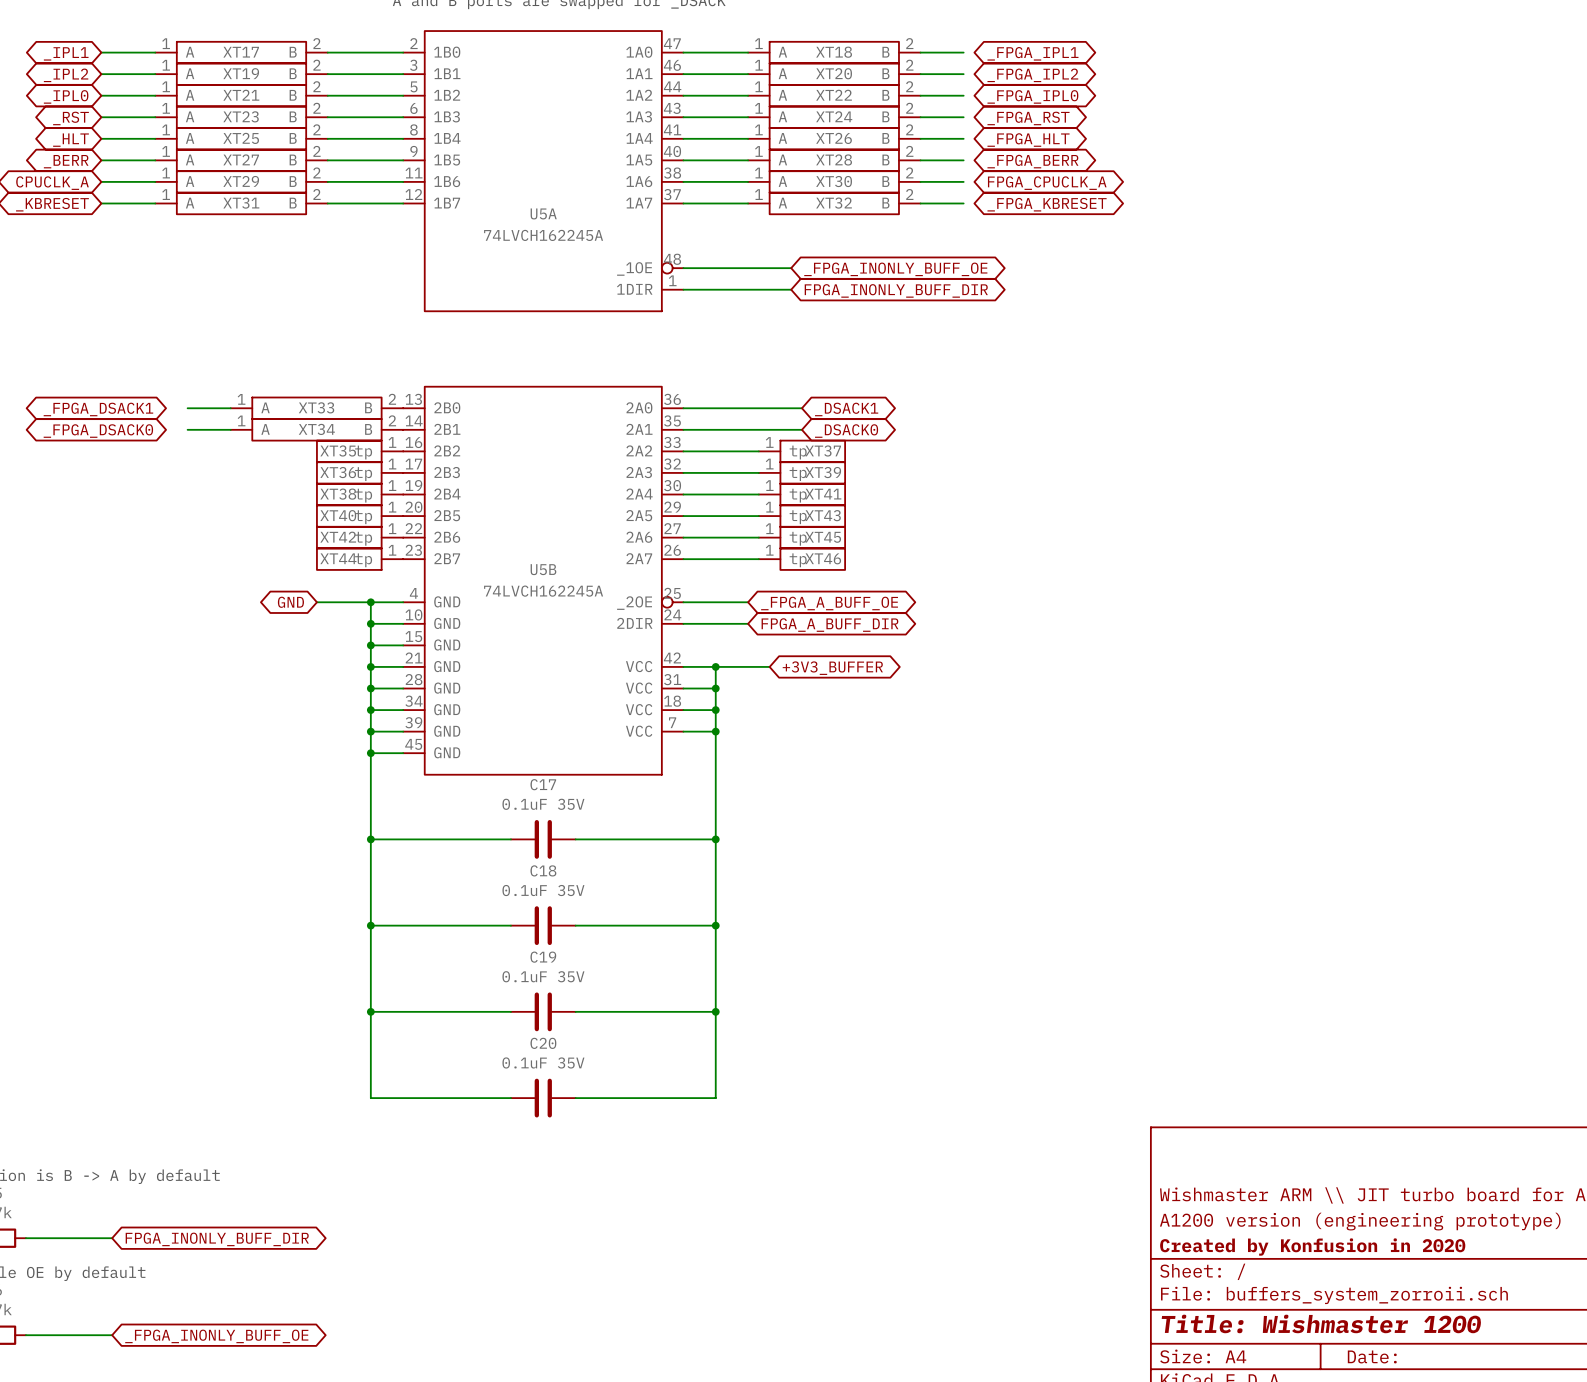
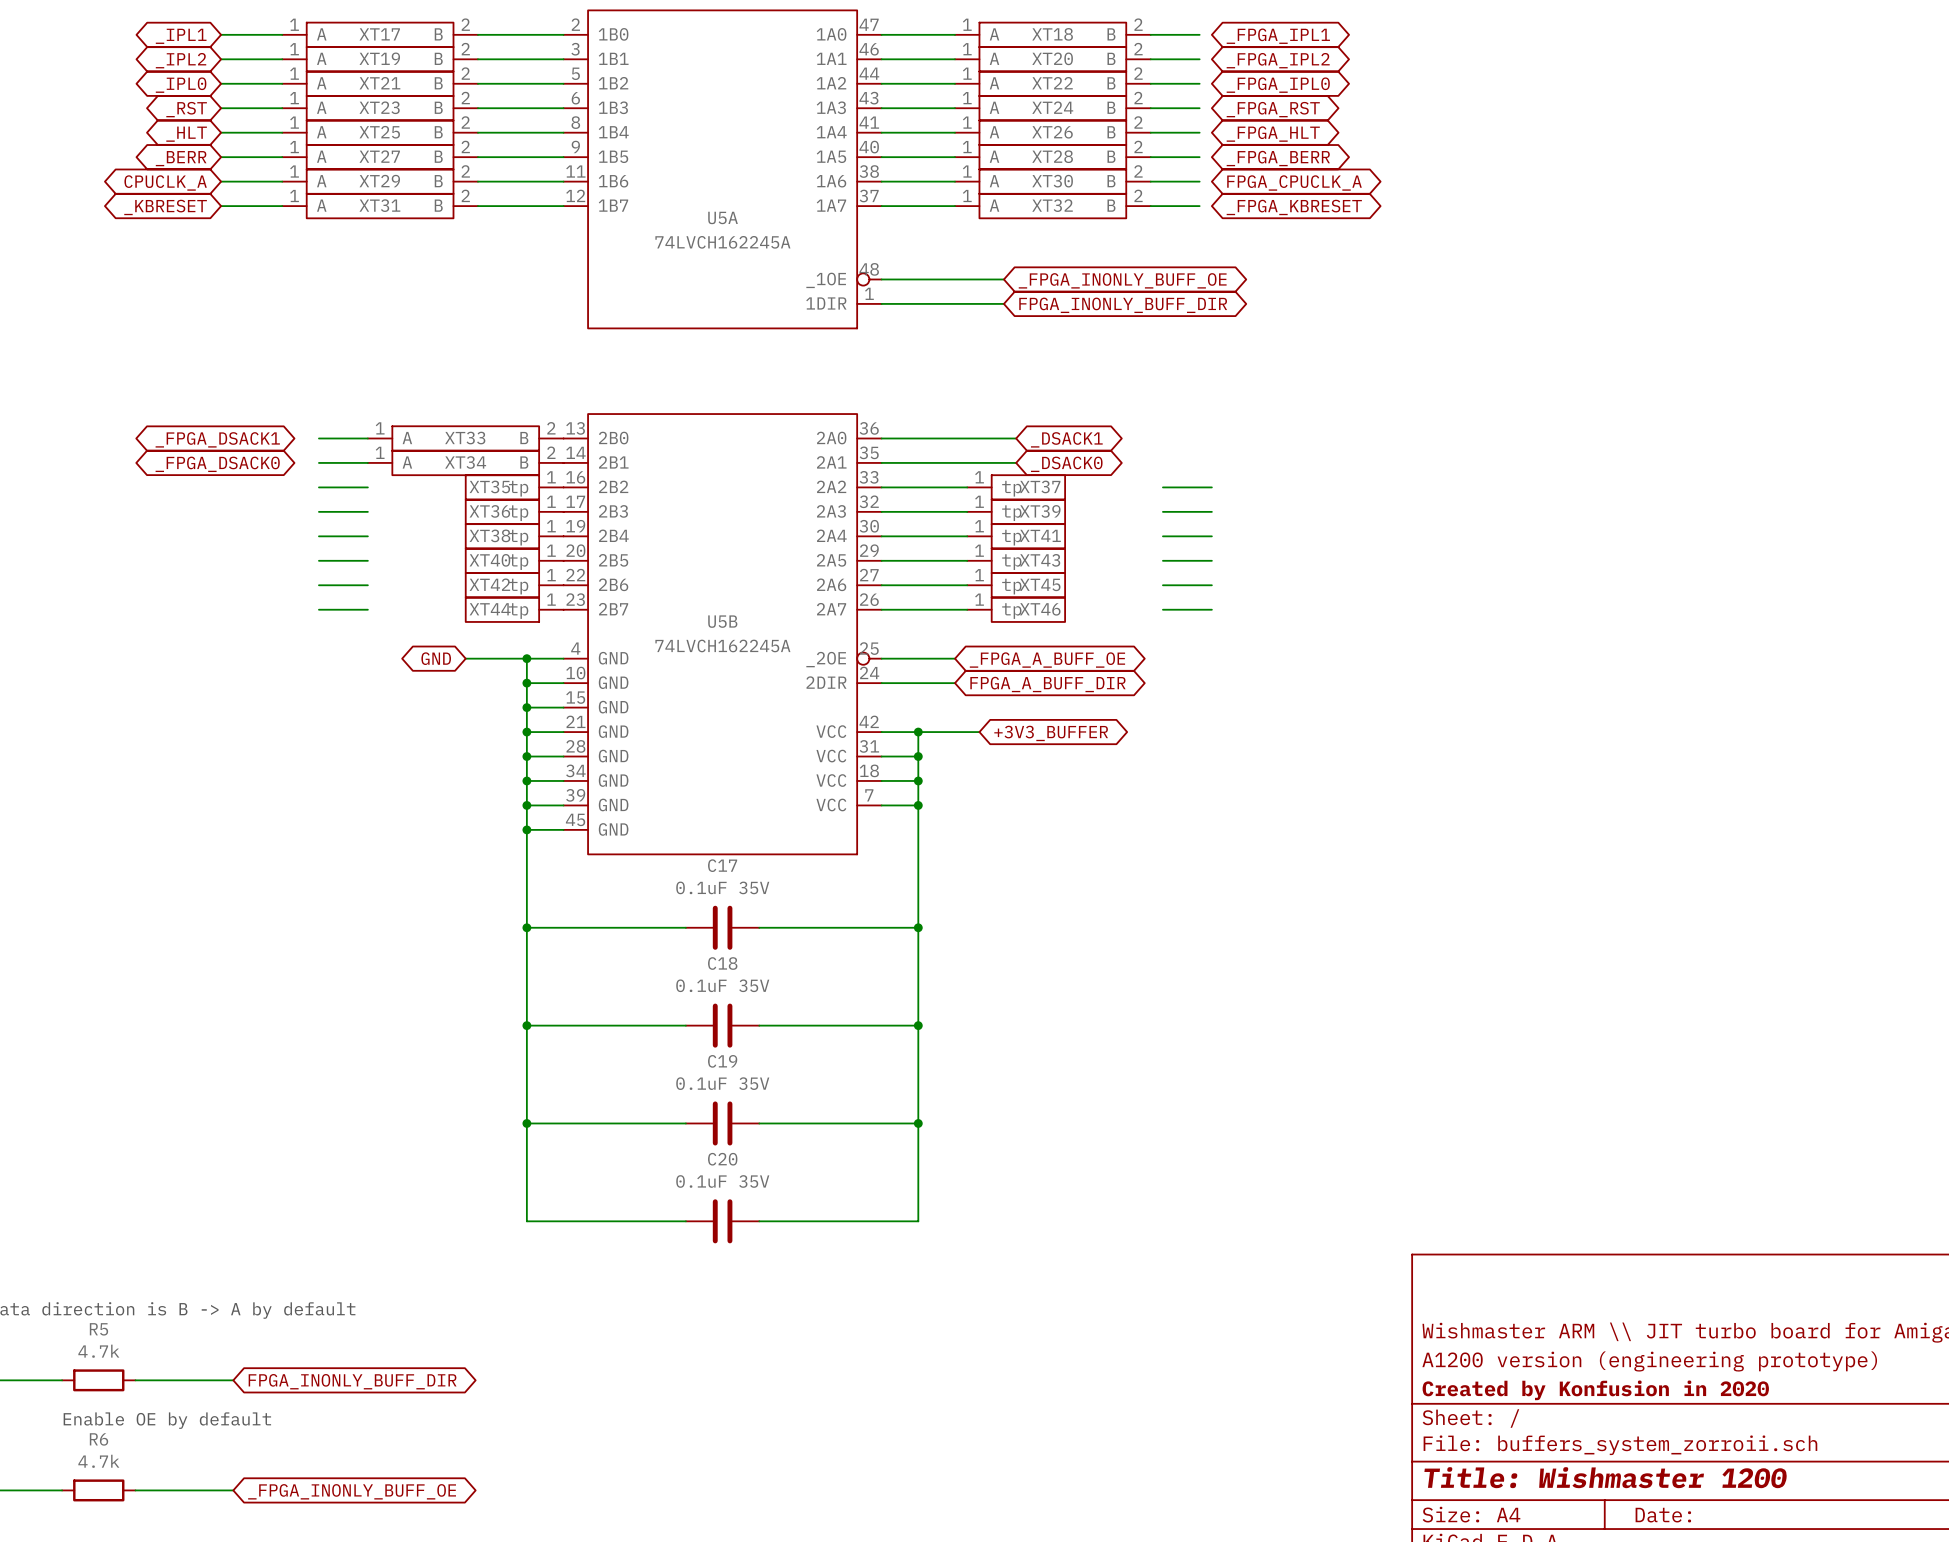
wire: none -> (318, 487) (367, 487)
wire: none -> (1162, 487) (1211, 487)
wire: none -> (318, 511) (367, 511)
wire: none -> (1162, 511) (1211, 511)
wire: none -> (318, 536) (367, 536)
wire: none -> (1162, 536) (1211, 536)
wire: none -> (318, 560) (367, 560)
wire: none -> (1162, 560) (1211, 560)
wire: none -> (318, 585) (367, 585)
wire: none -> (1162, 585) (1211, 585)
wire: none -> (318, 609) (367, 609)
wire: none -> (1162, 609) (1211, 609)

